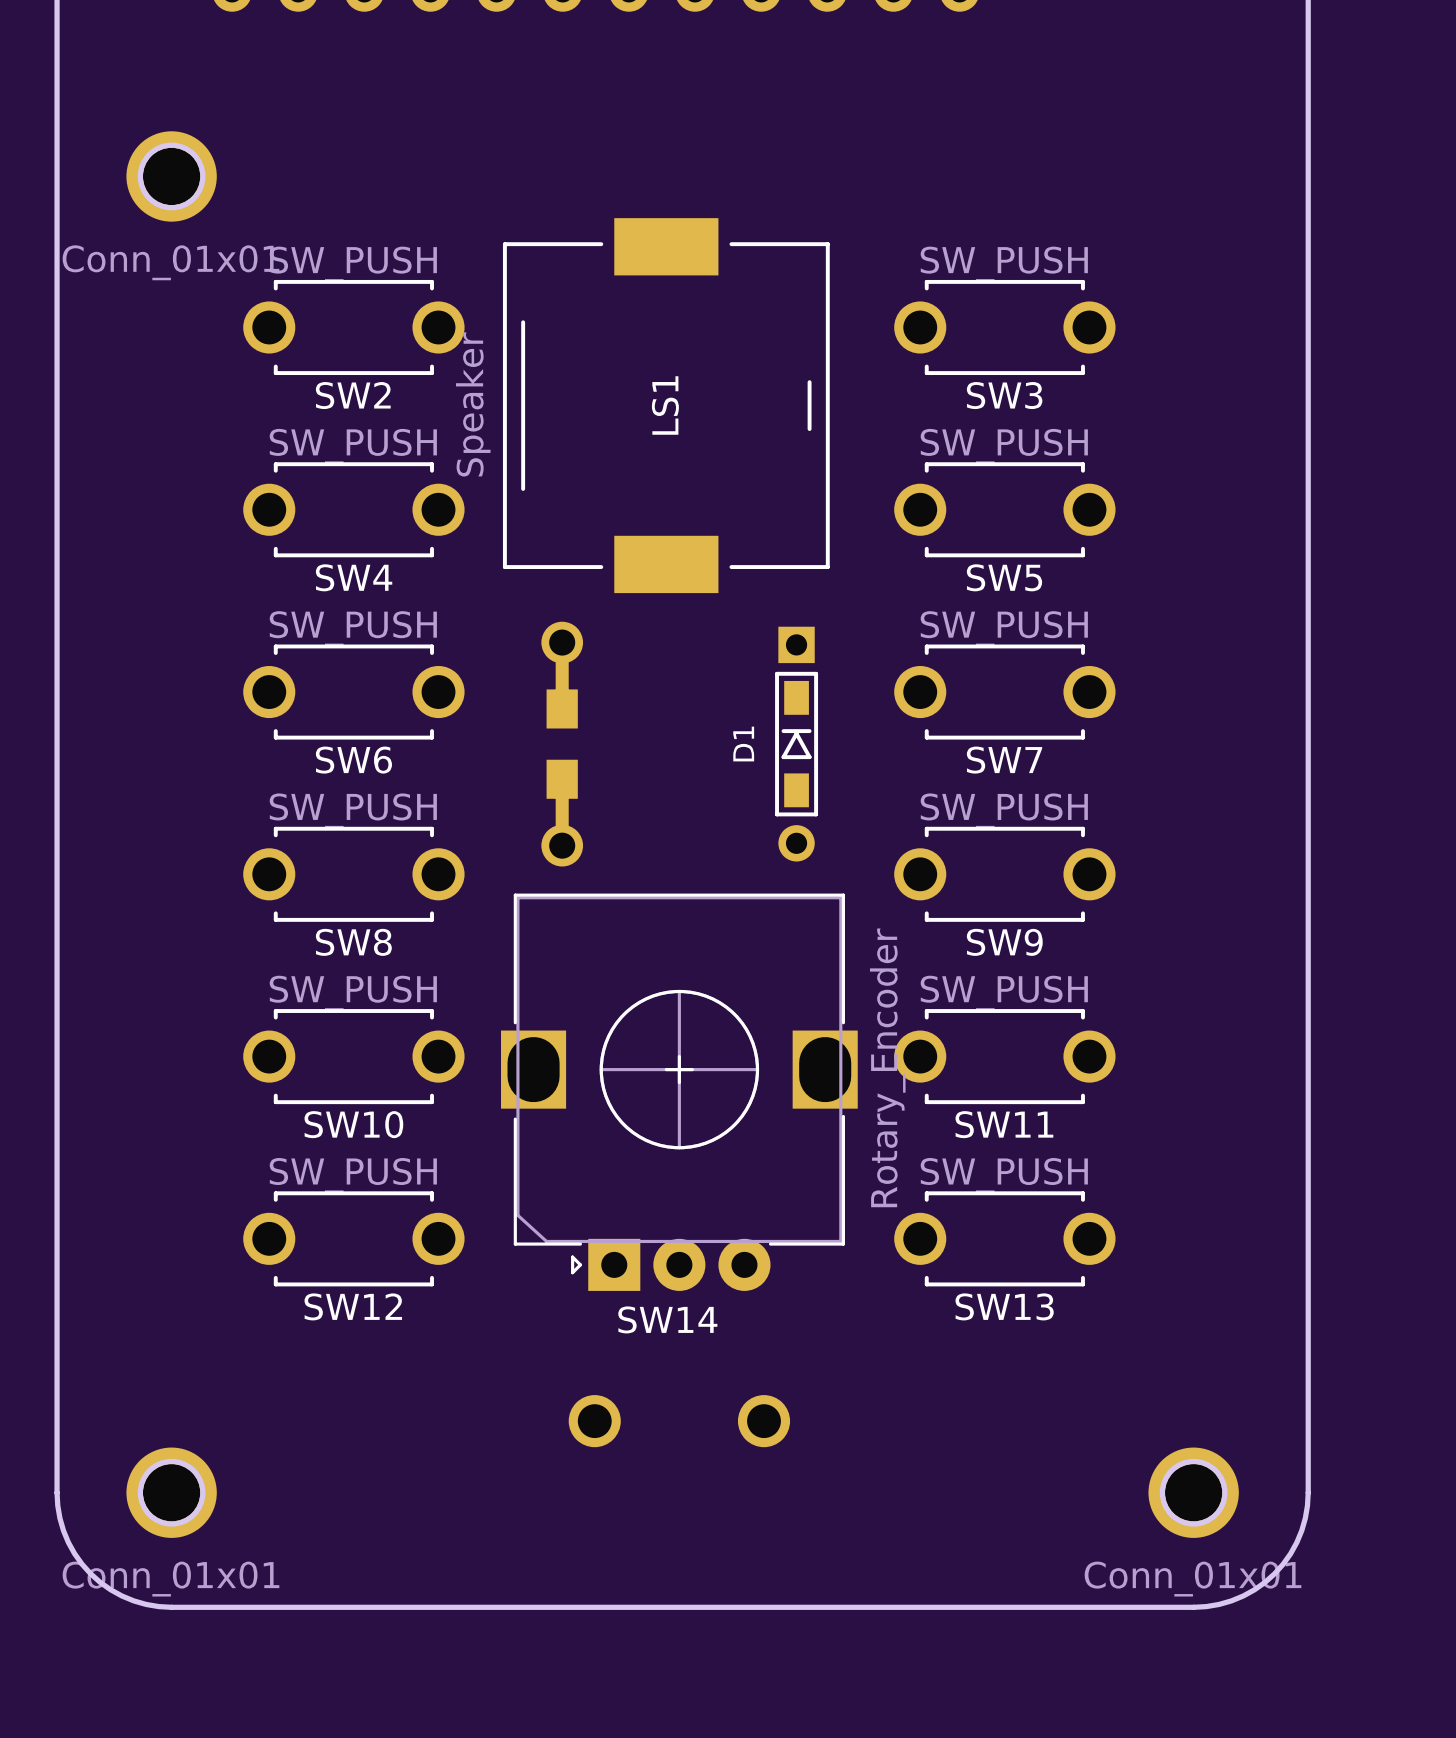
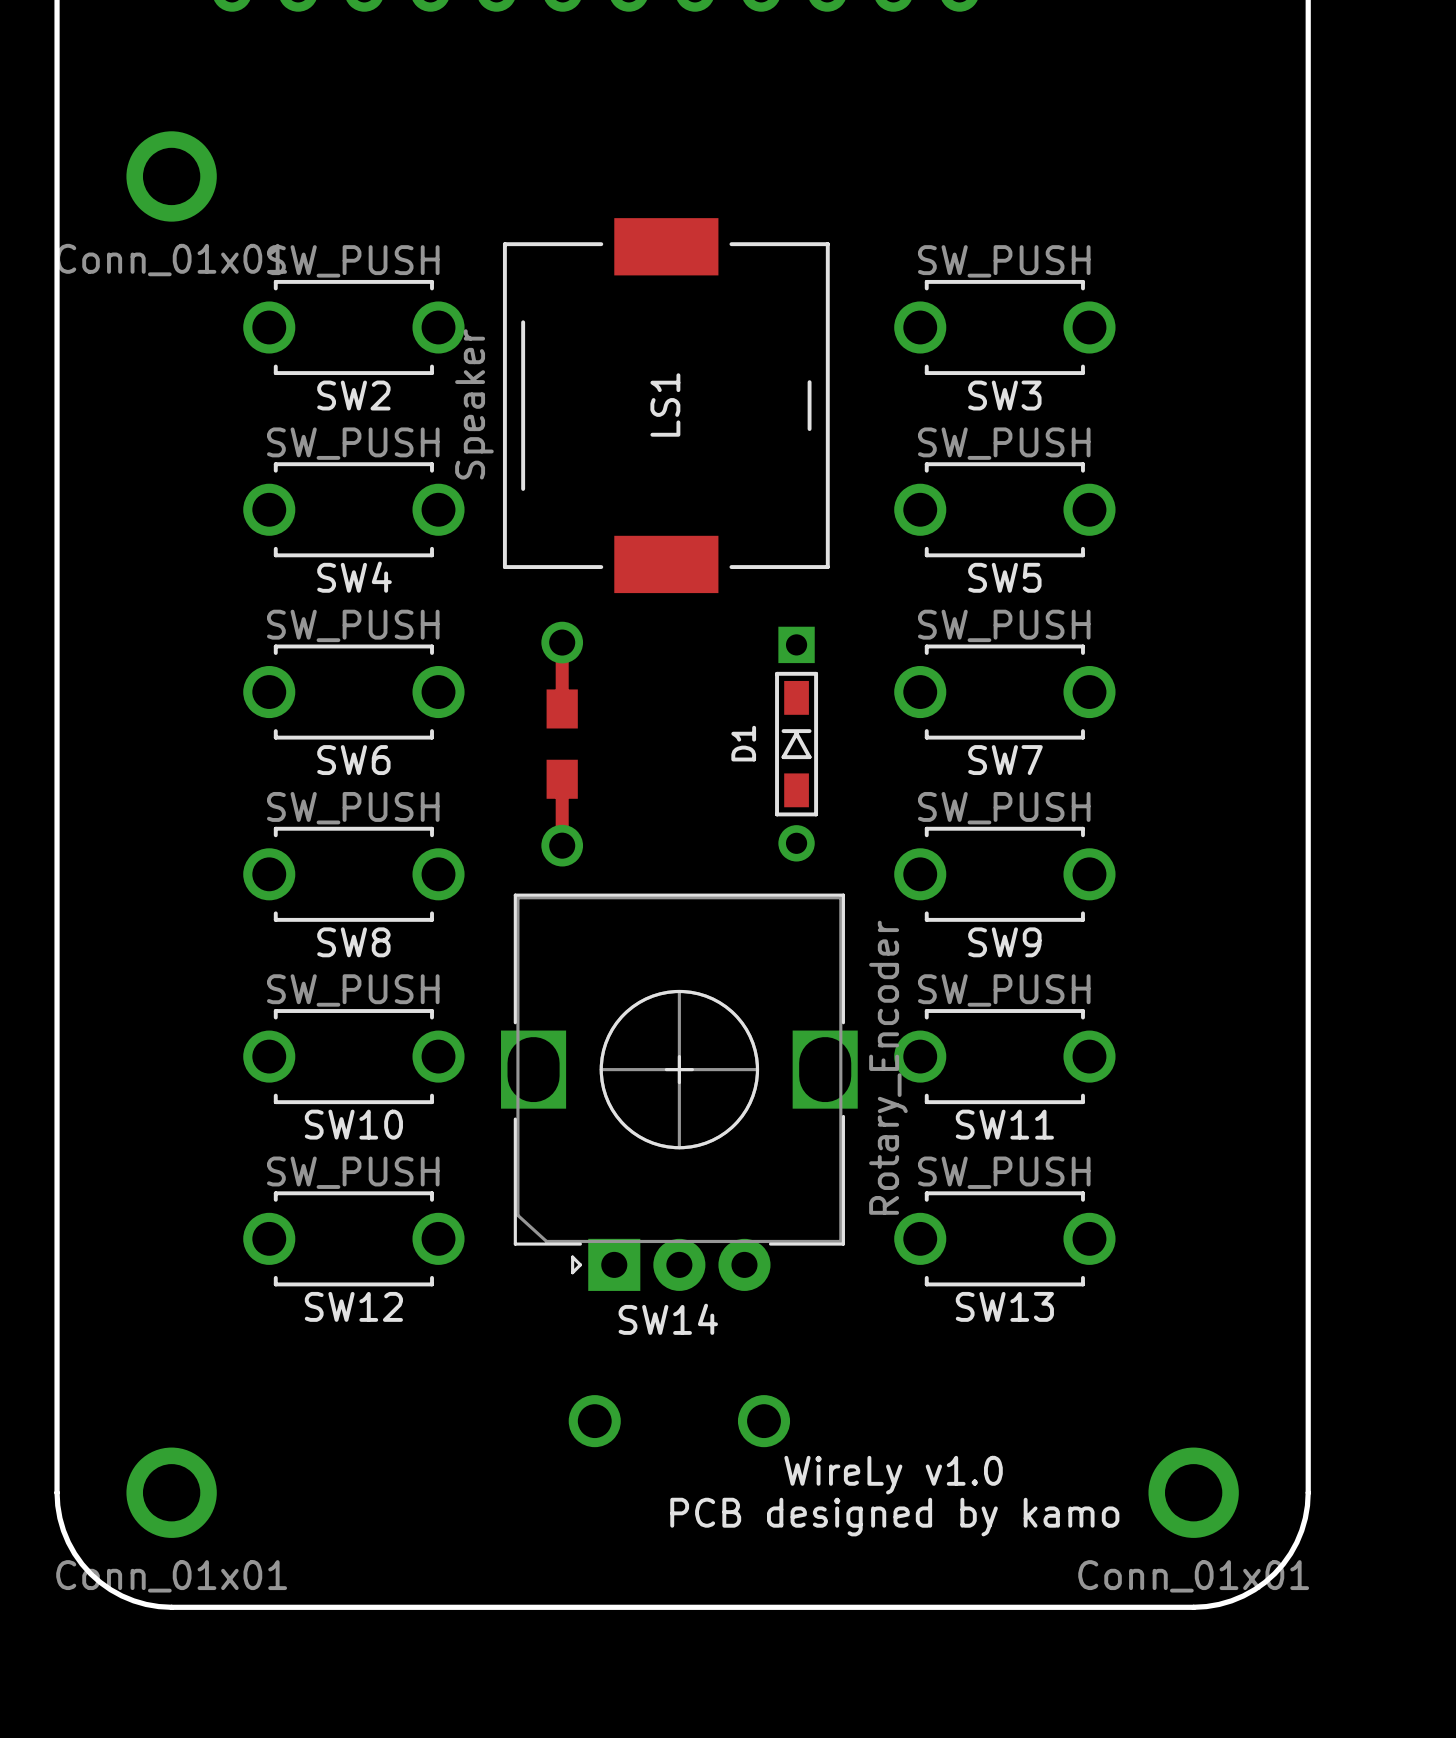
round board edge: [137, 142, 206, 211] -> none
round board edge: [137, 1458, 206, 1527] -> none
round board edge: [1159, 1458, 1228, 1527] -> none
text: none -> WireLy v1.0 (893, 1475)
text: none -> PCB designed by kamo (894, 1517)

